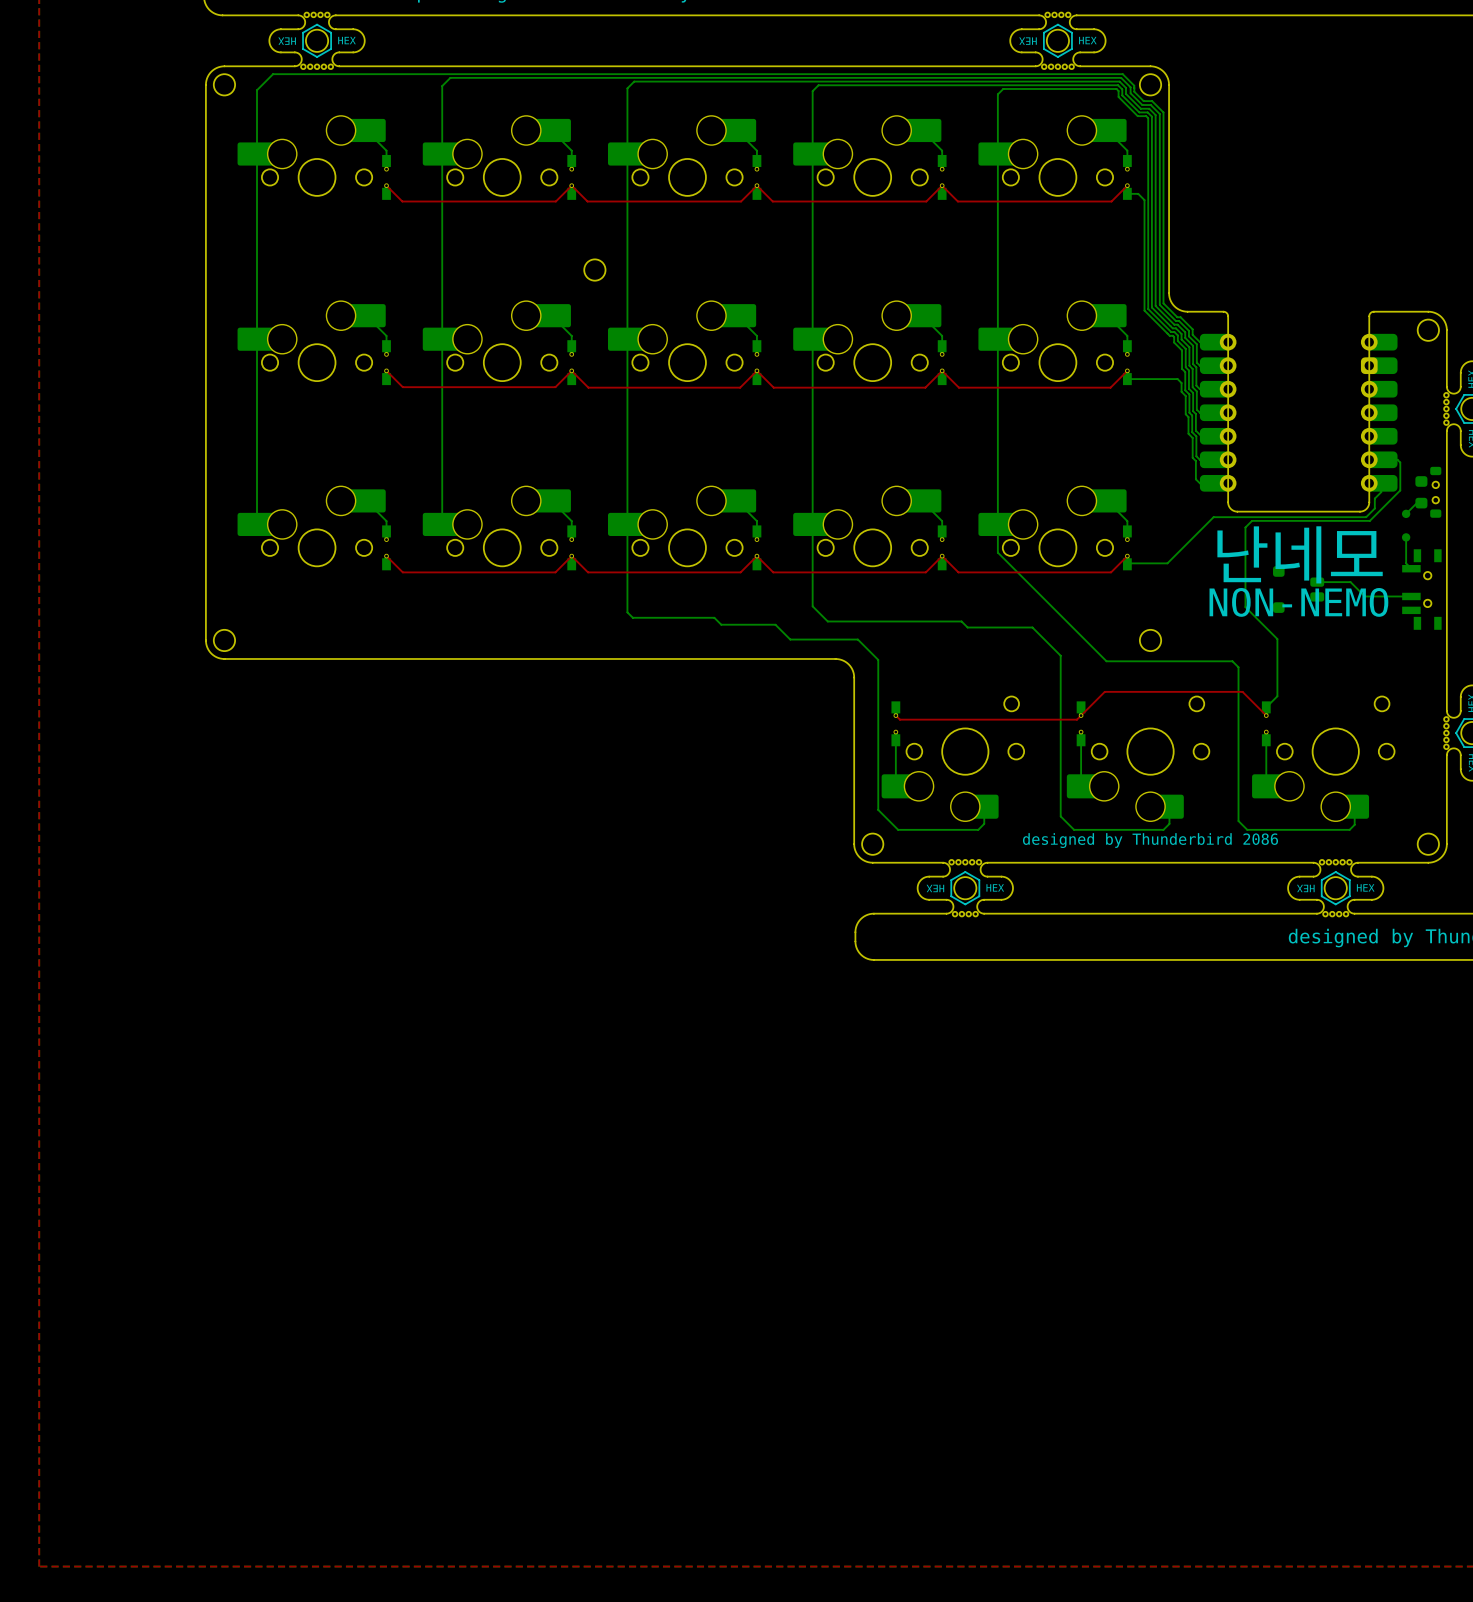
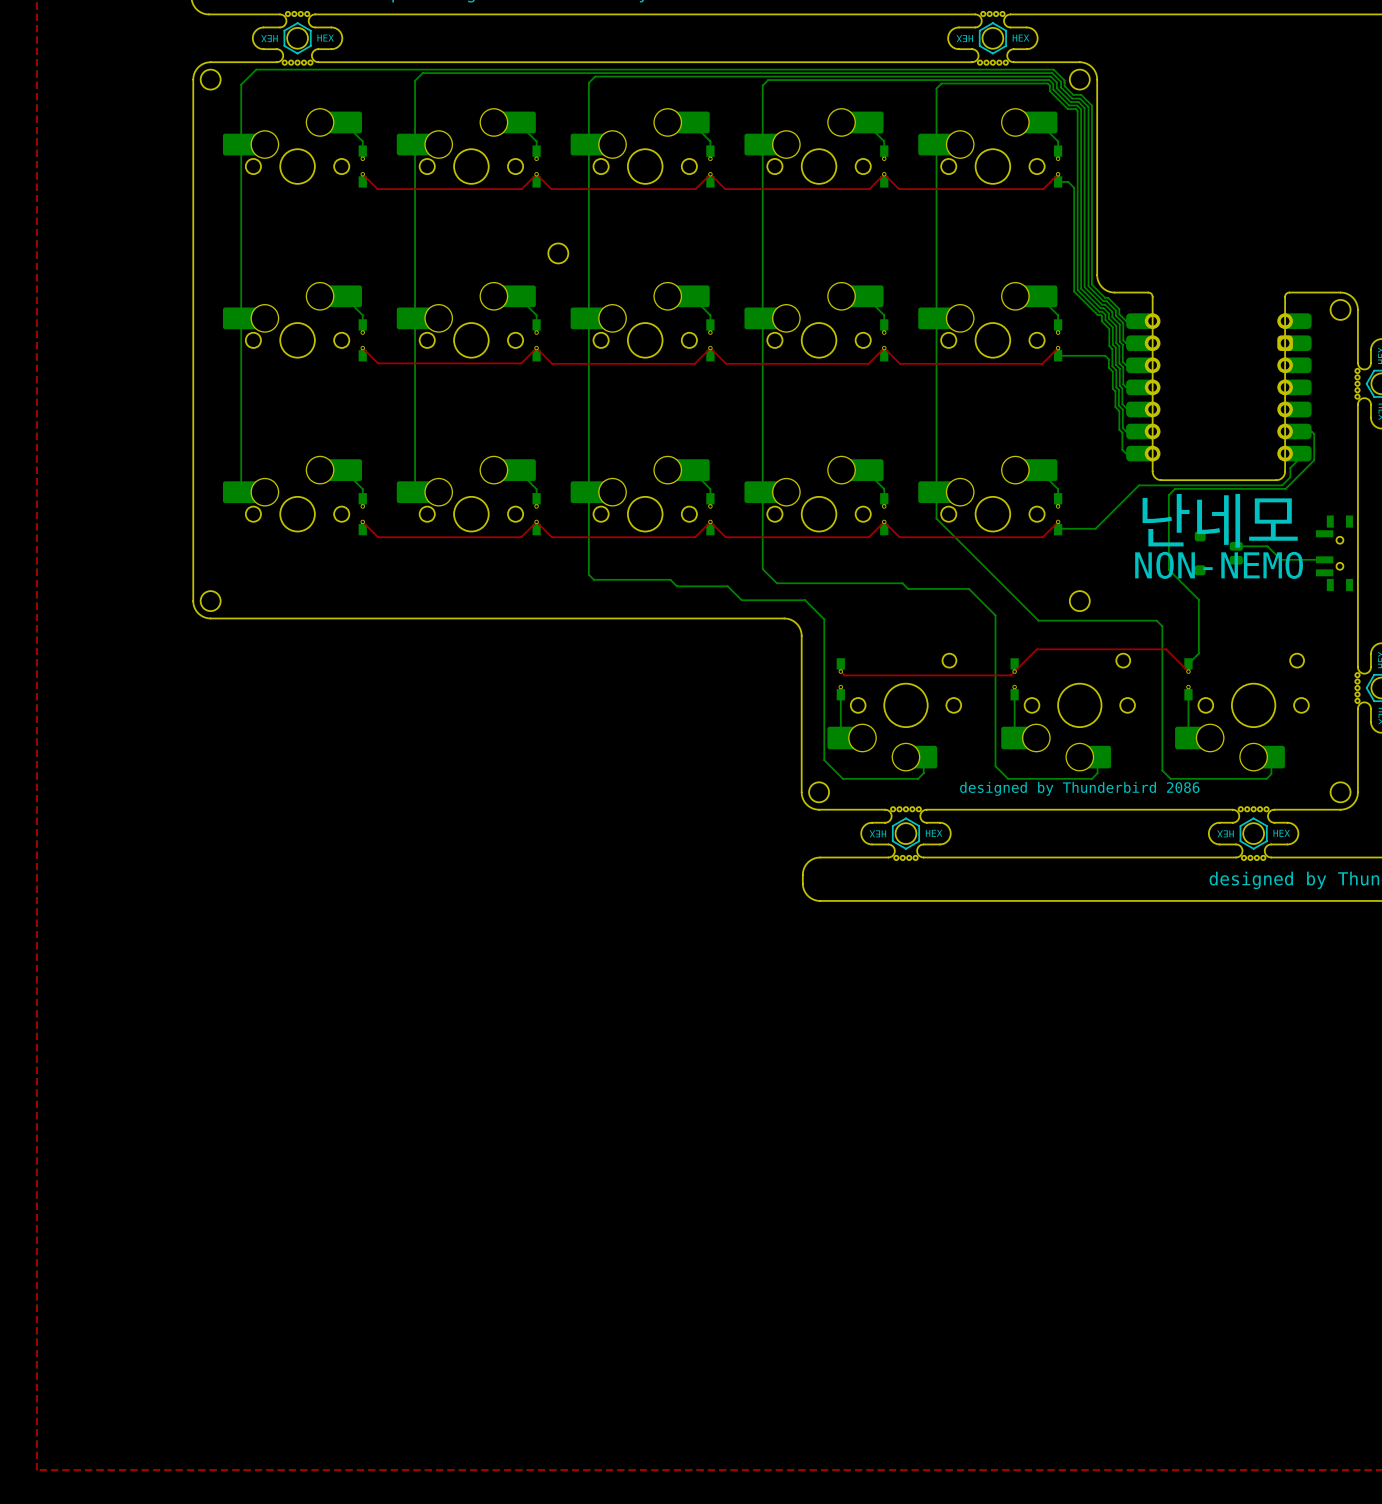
part: (1428, 492) -> none
bottom track: (1421, 503) (1416, 503) (1406, 513) -> none
part: (1406, 525) -> none
bottom track: (1406, 537) (1406, 563) (1411, 568) -> none

